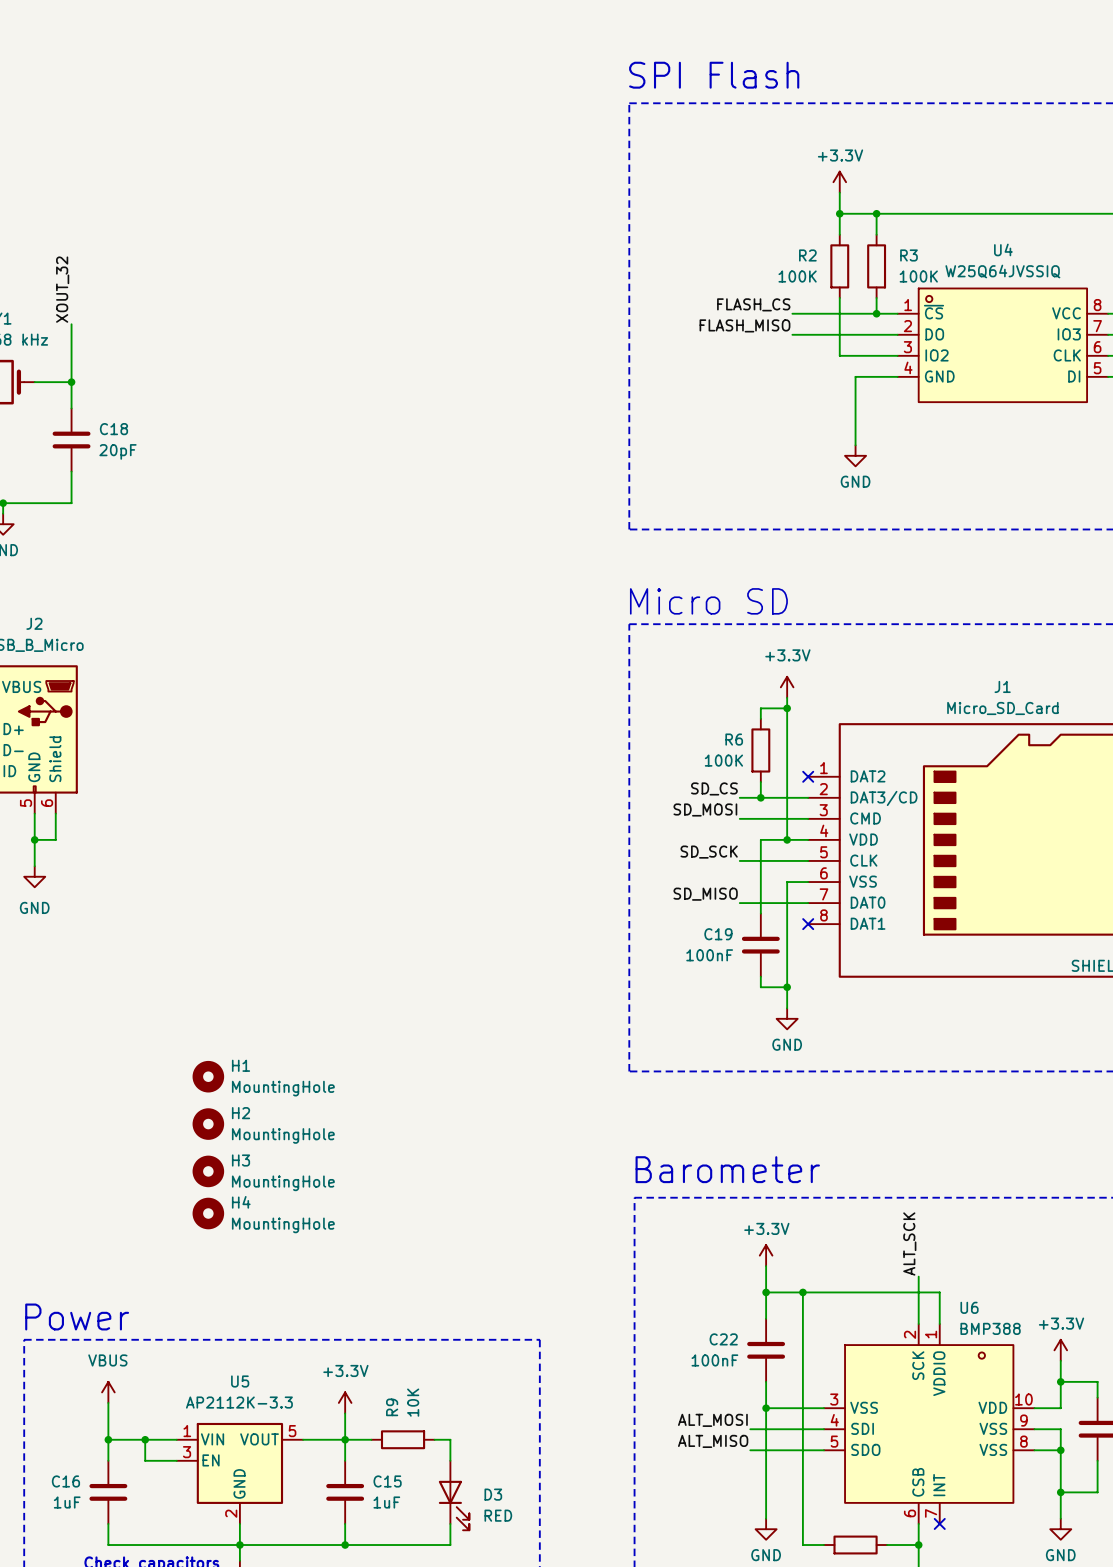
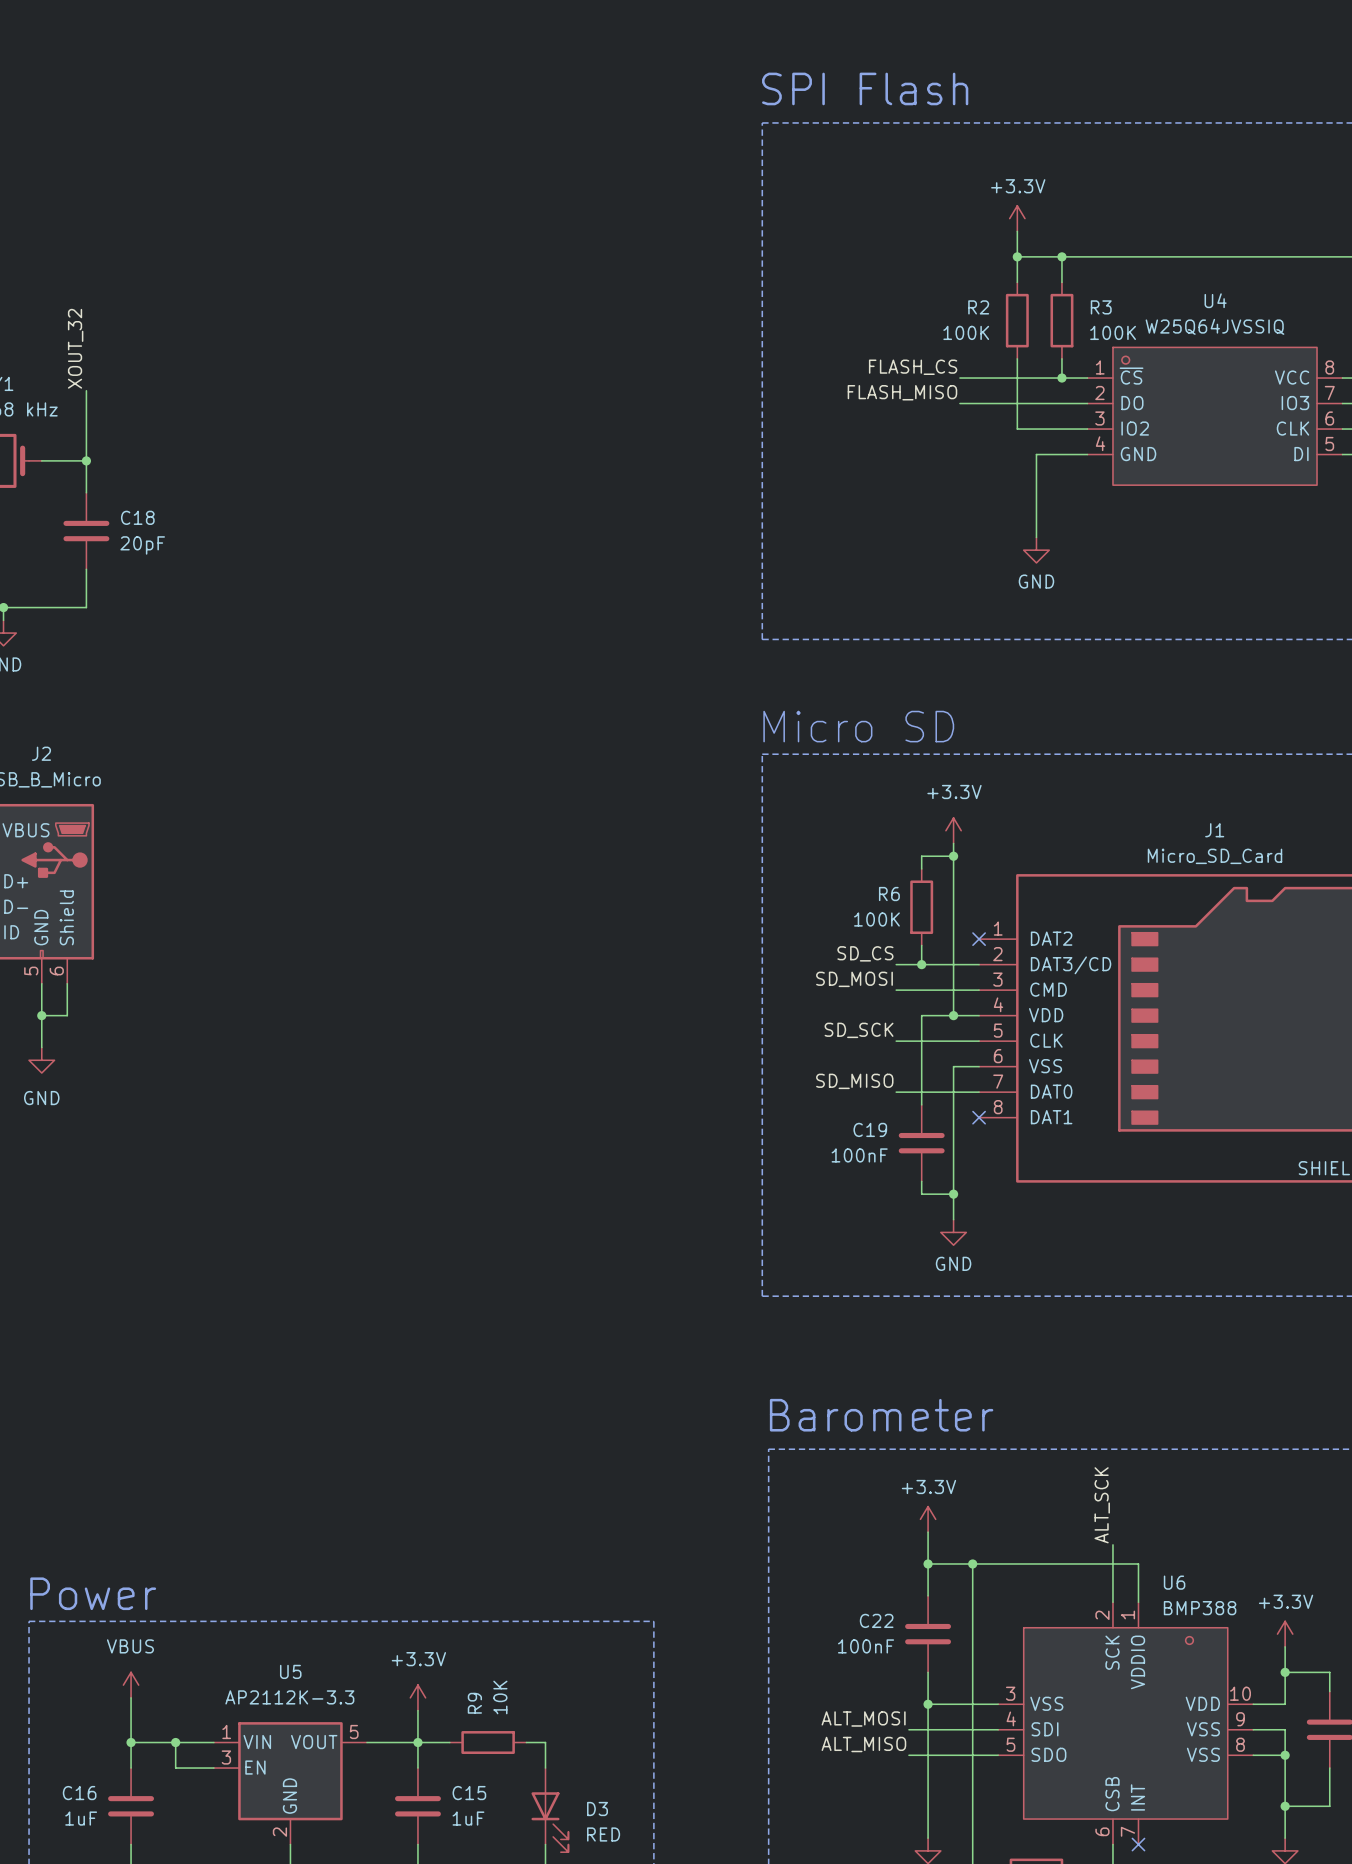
H1: MountingHole (208, 1076) -> none
H2: MountingHole (208, 1124) -> none
H3: MountingHole (208, 1171) -> none
H4: MountingHole (208, 1213) -> none

